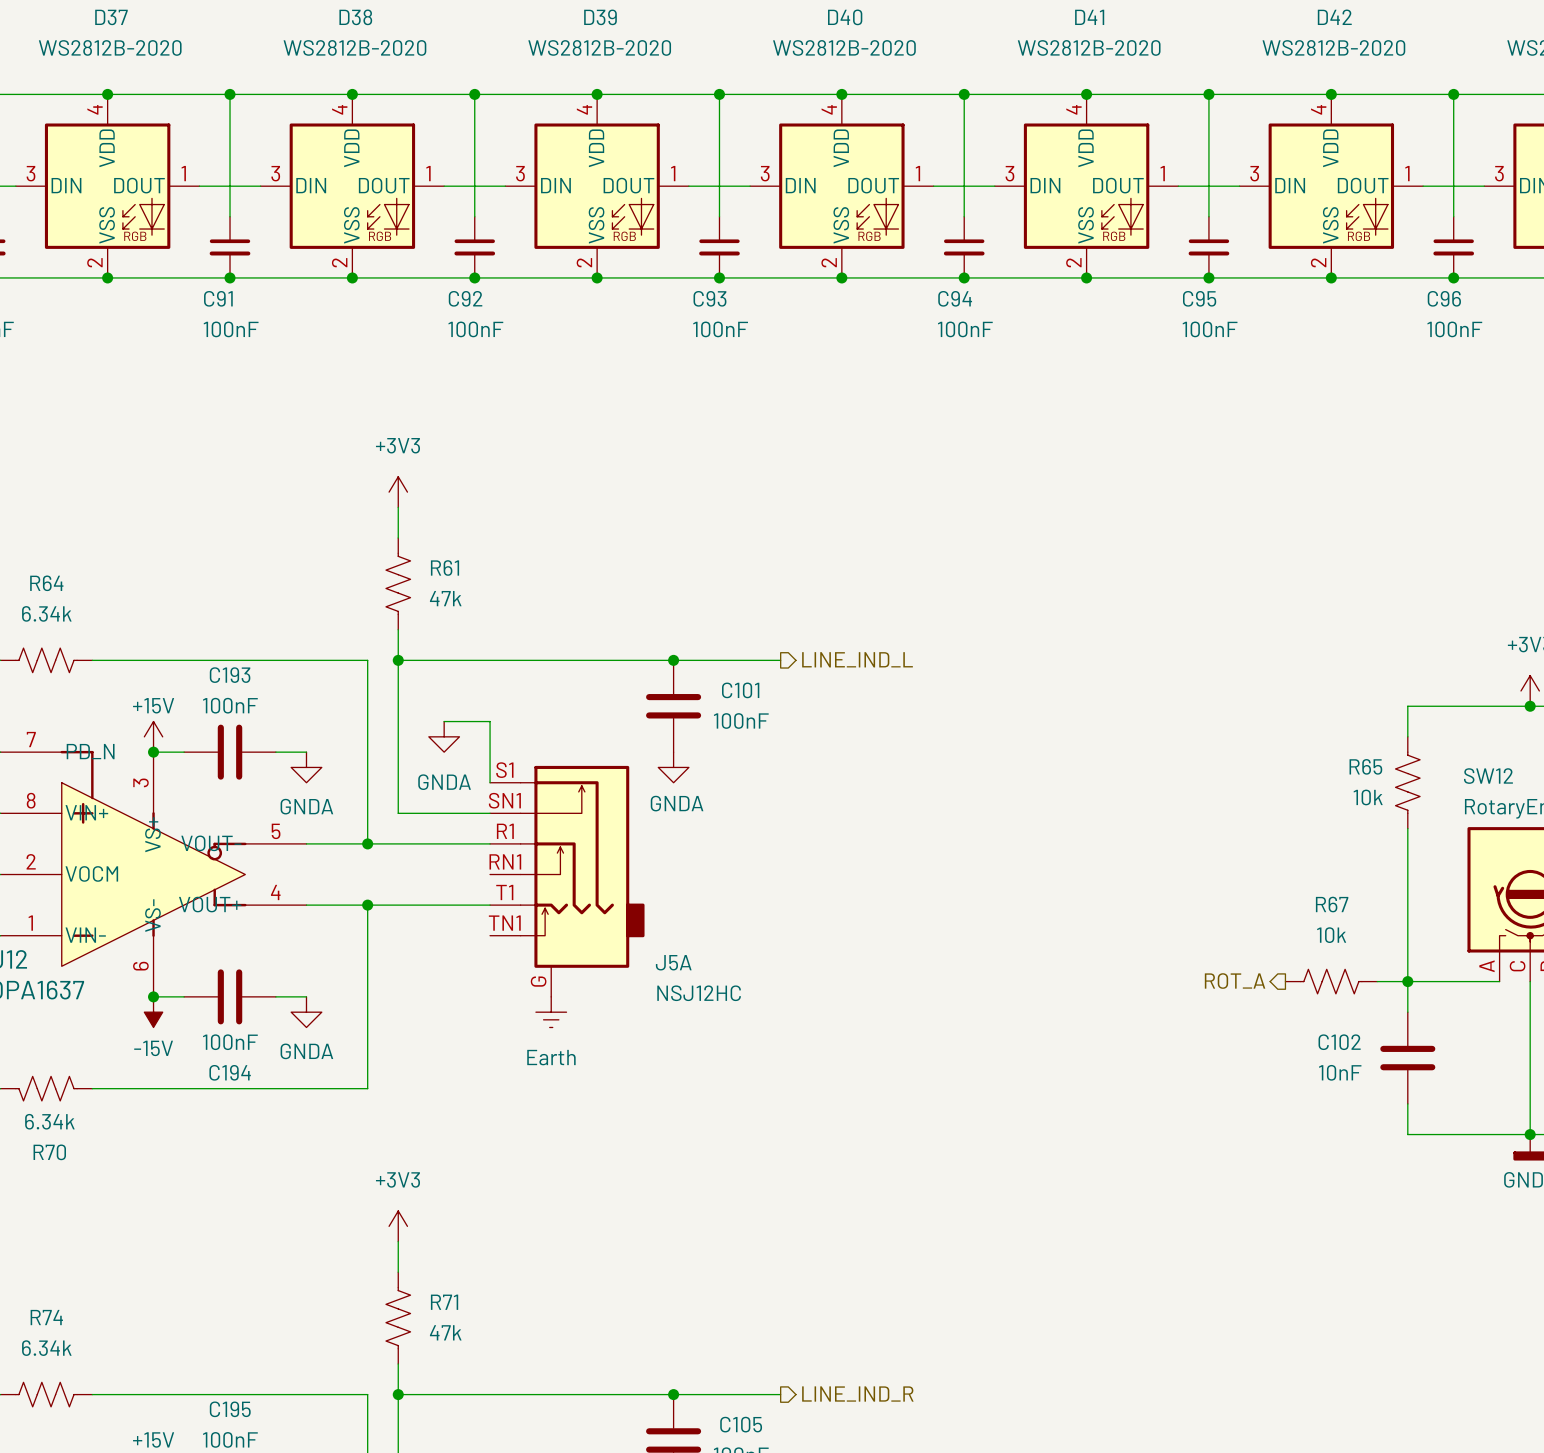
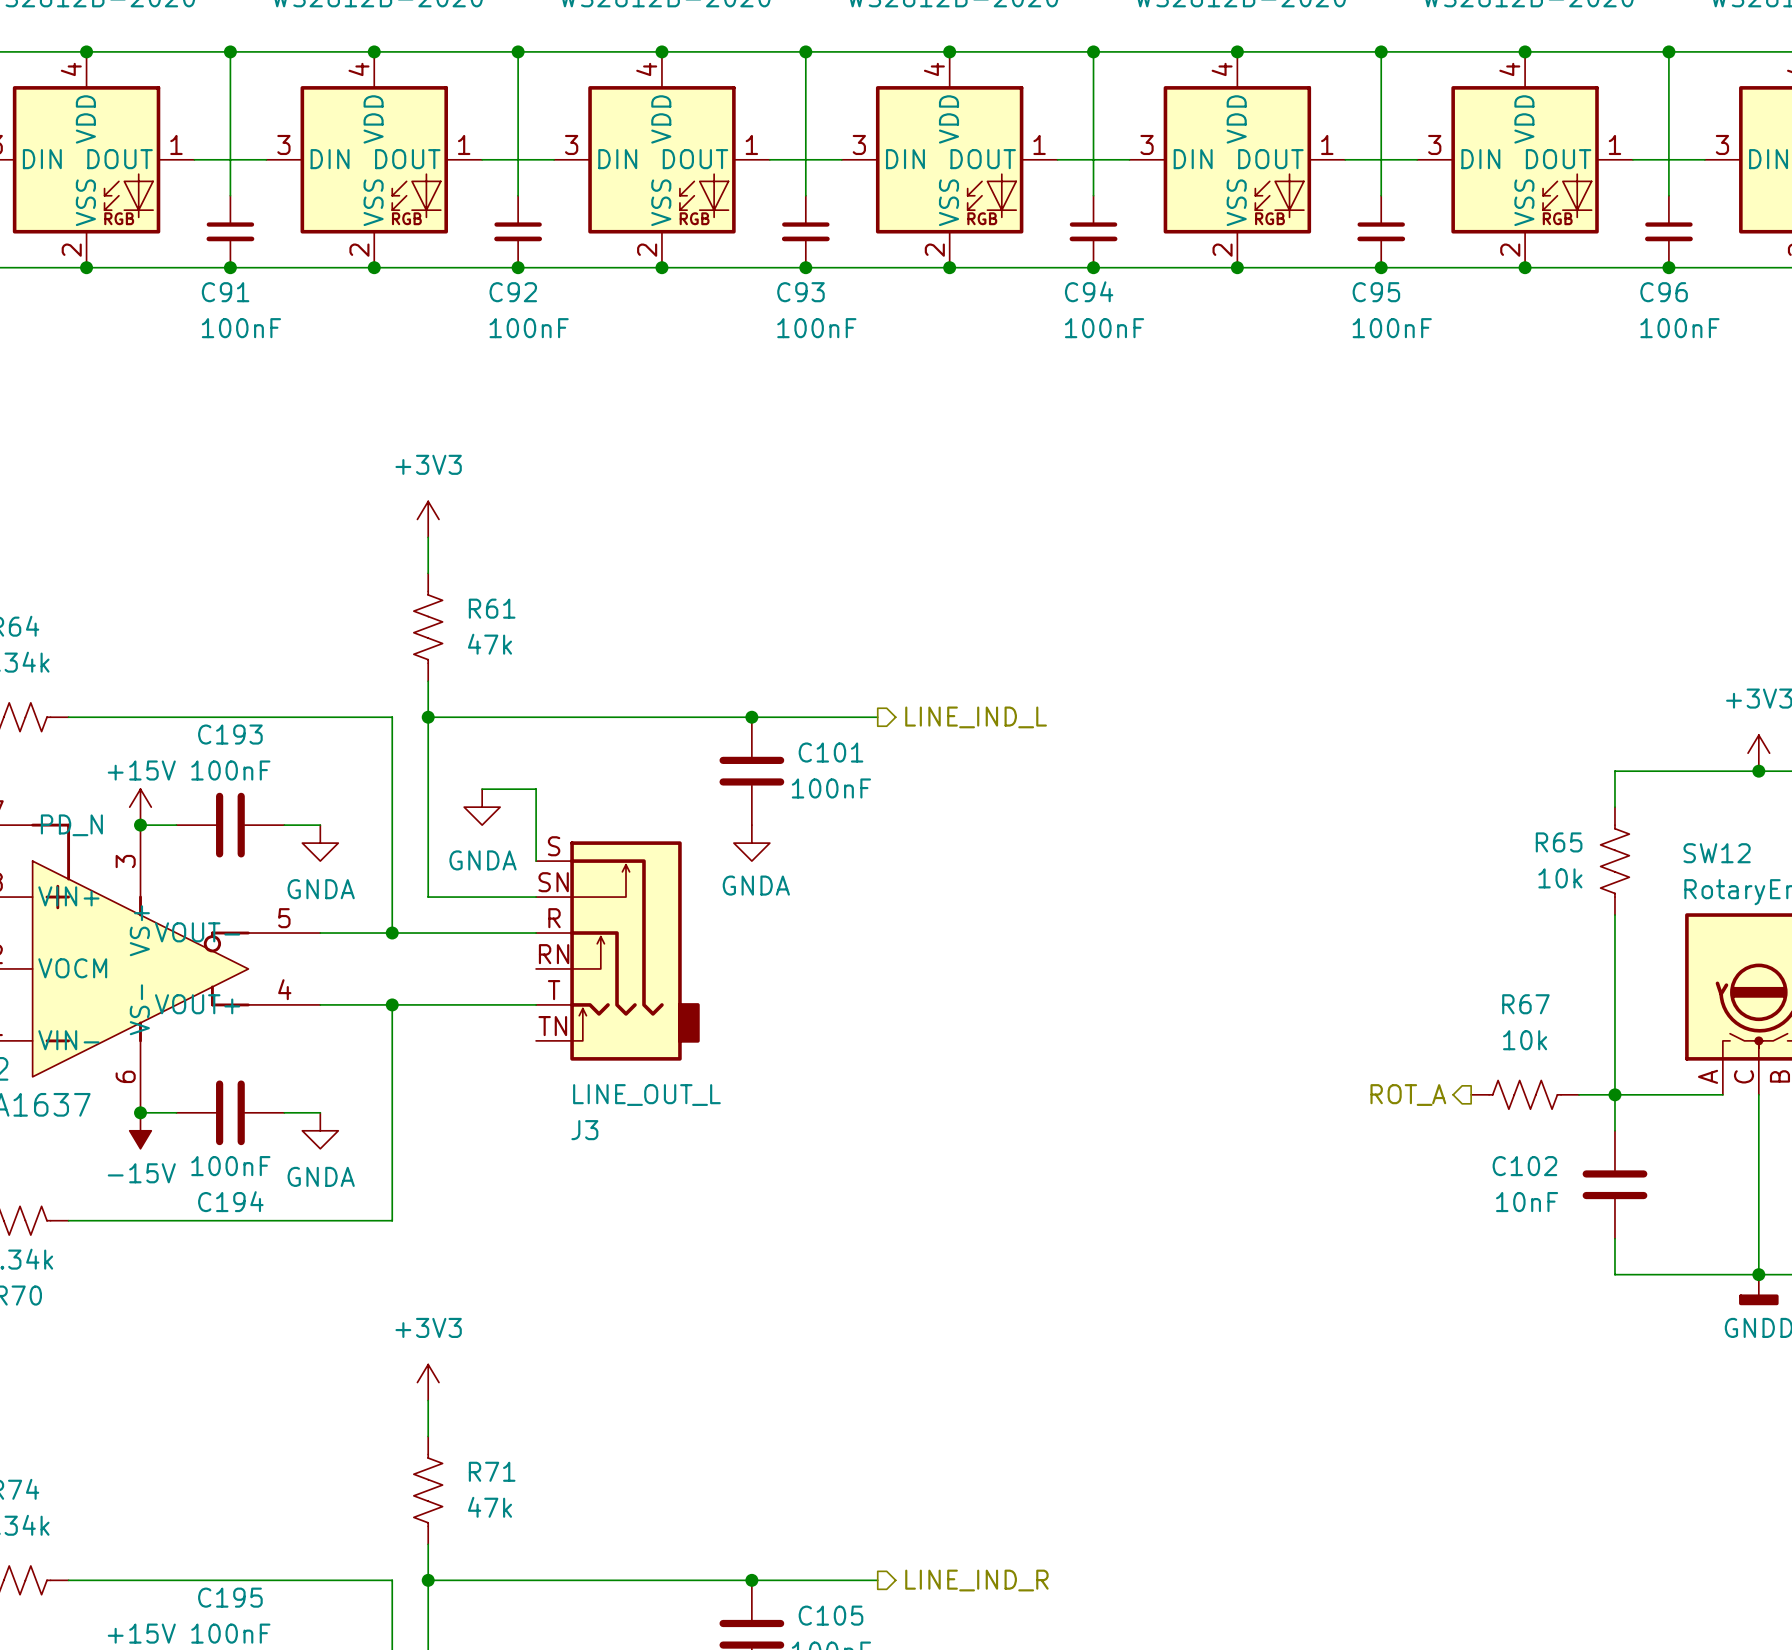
J3: none -> LINE_OUT_L (617, 950)
J5A: NSJ12HC (567, 881) -> none
power symbol: Earth (551, 1012) -> none

